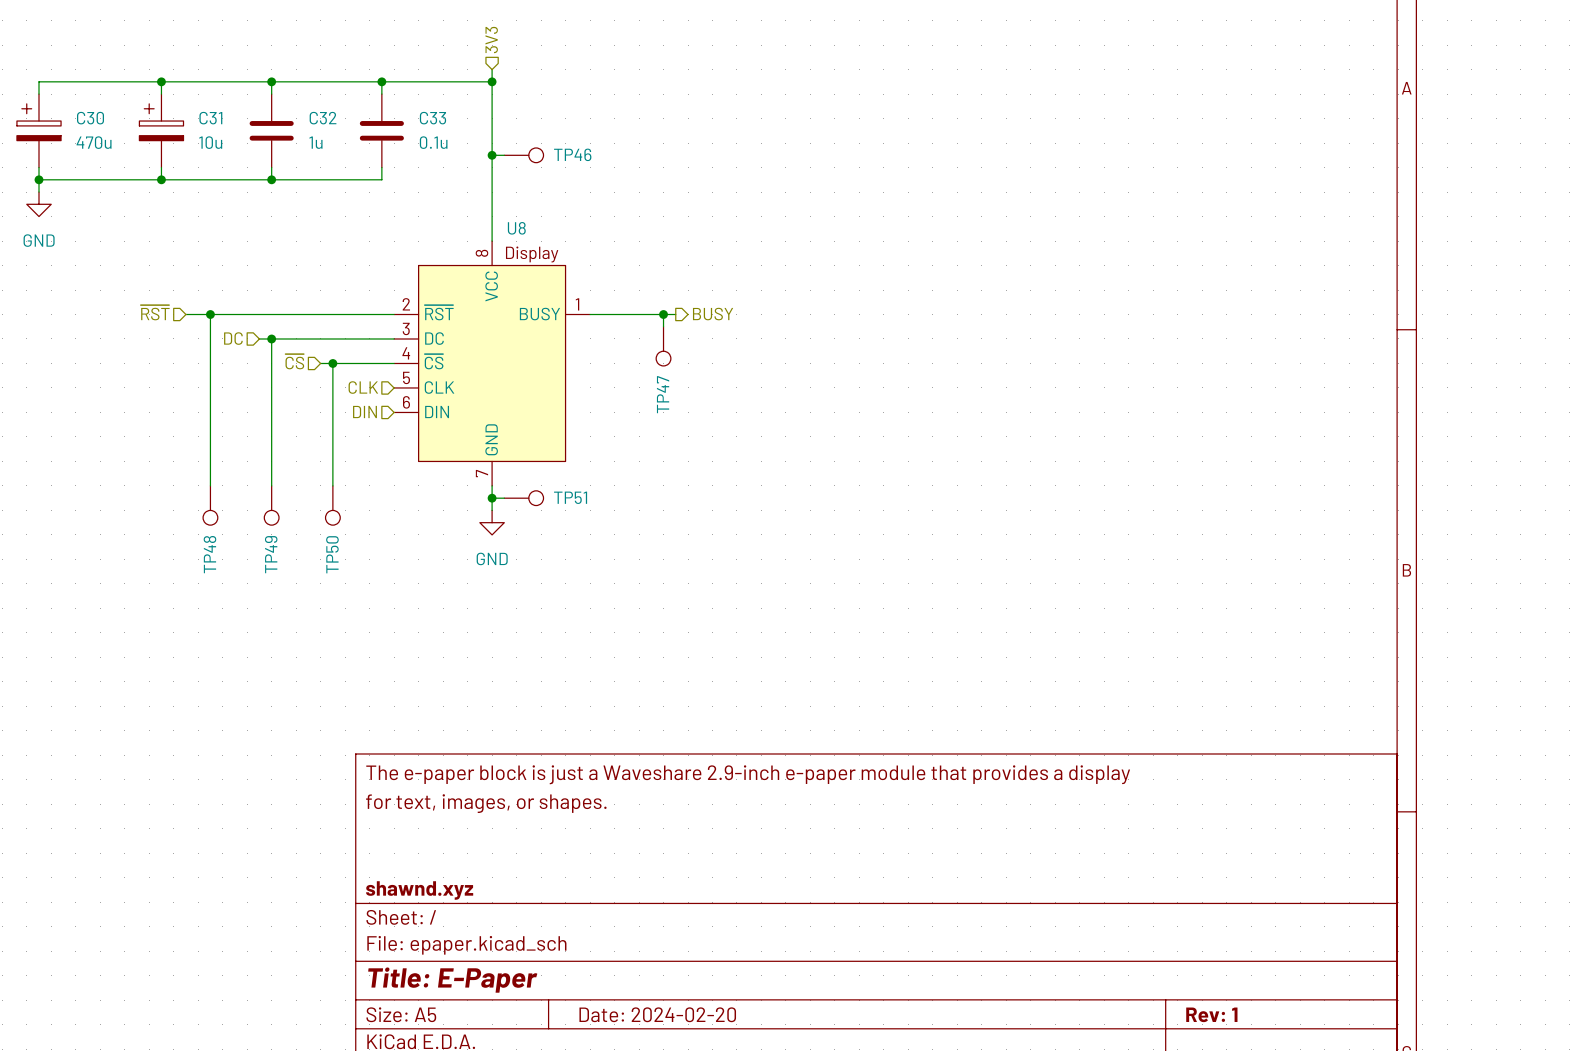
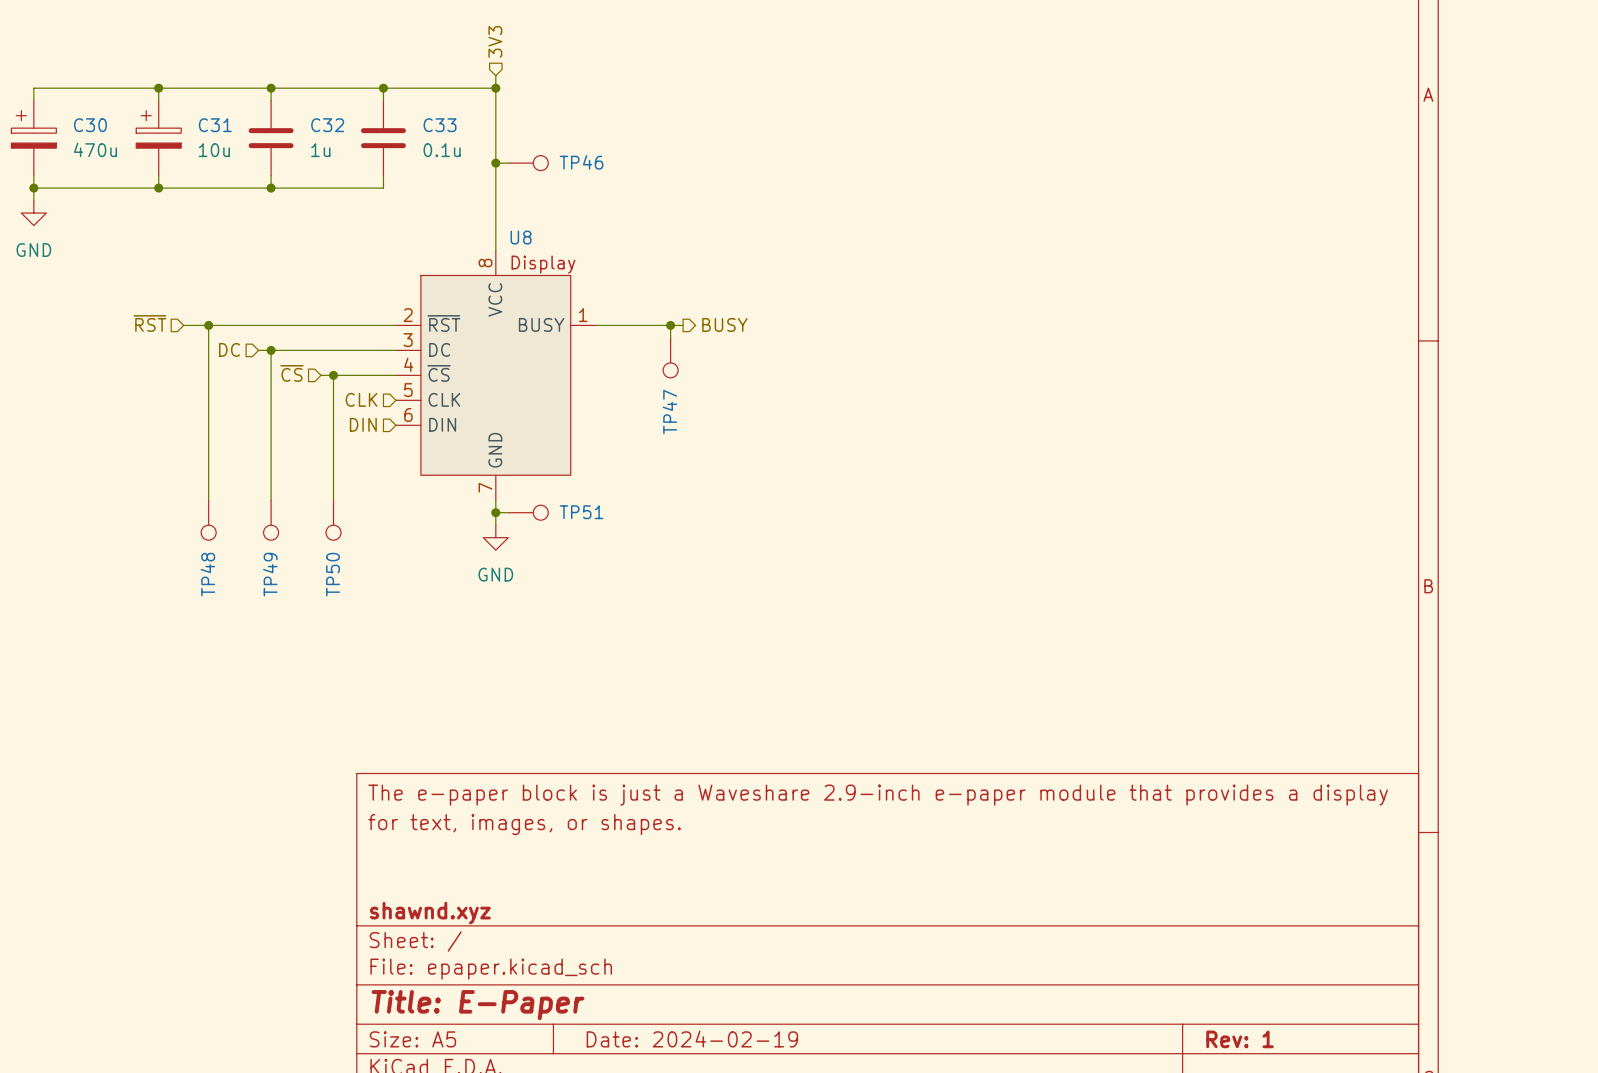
title block: Date: 2024-02-20 (657, 1014) -> Date: 2024-02-19 (692, 1039)

